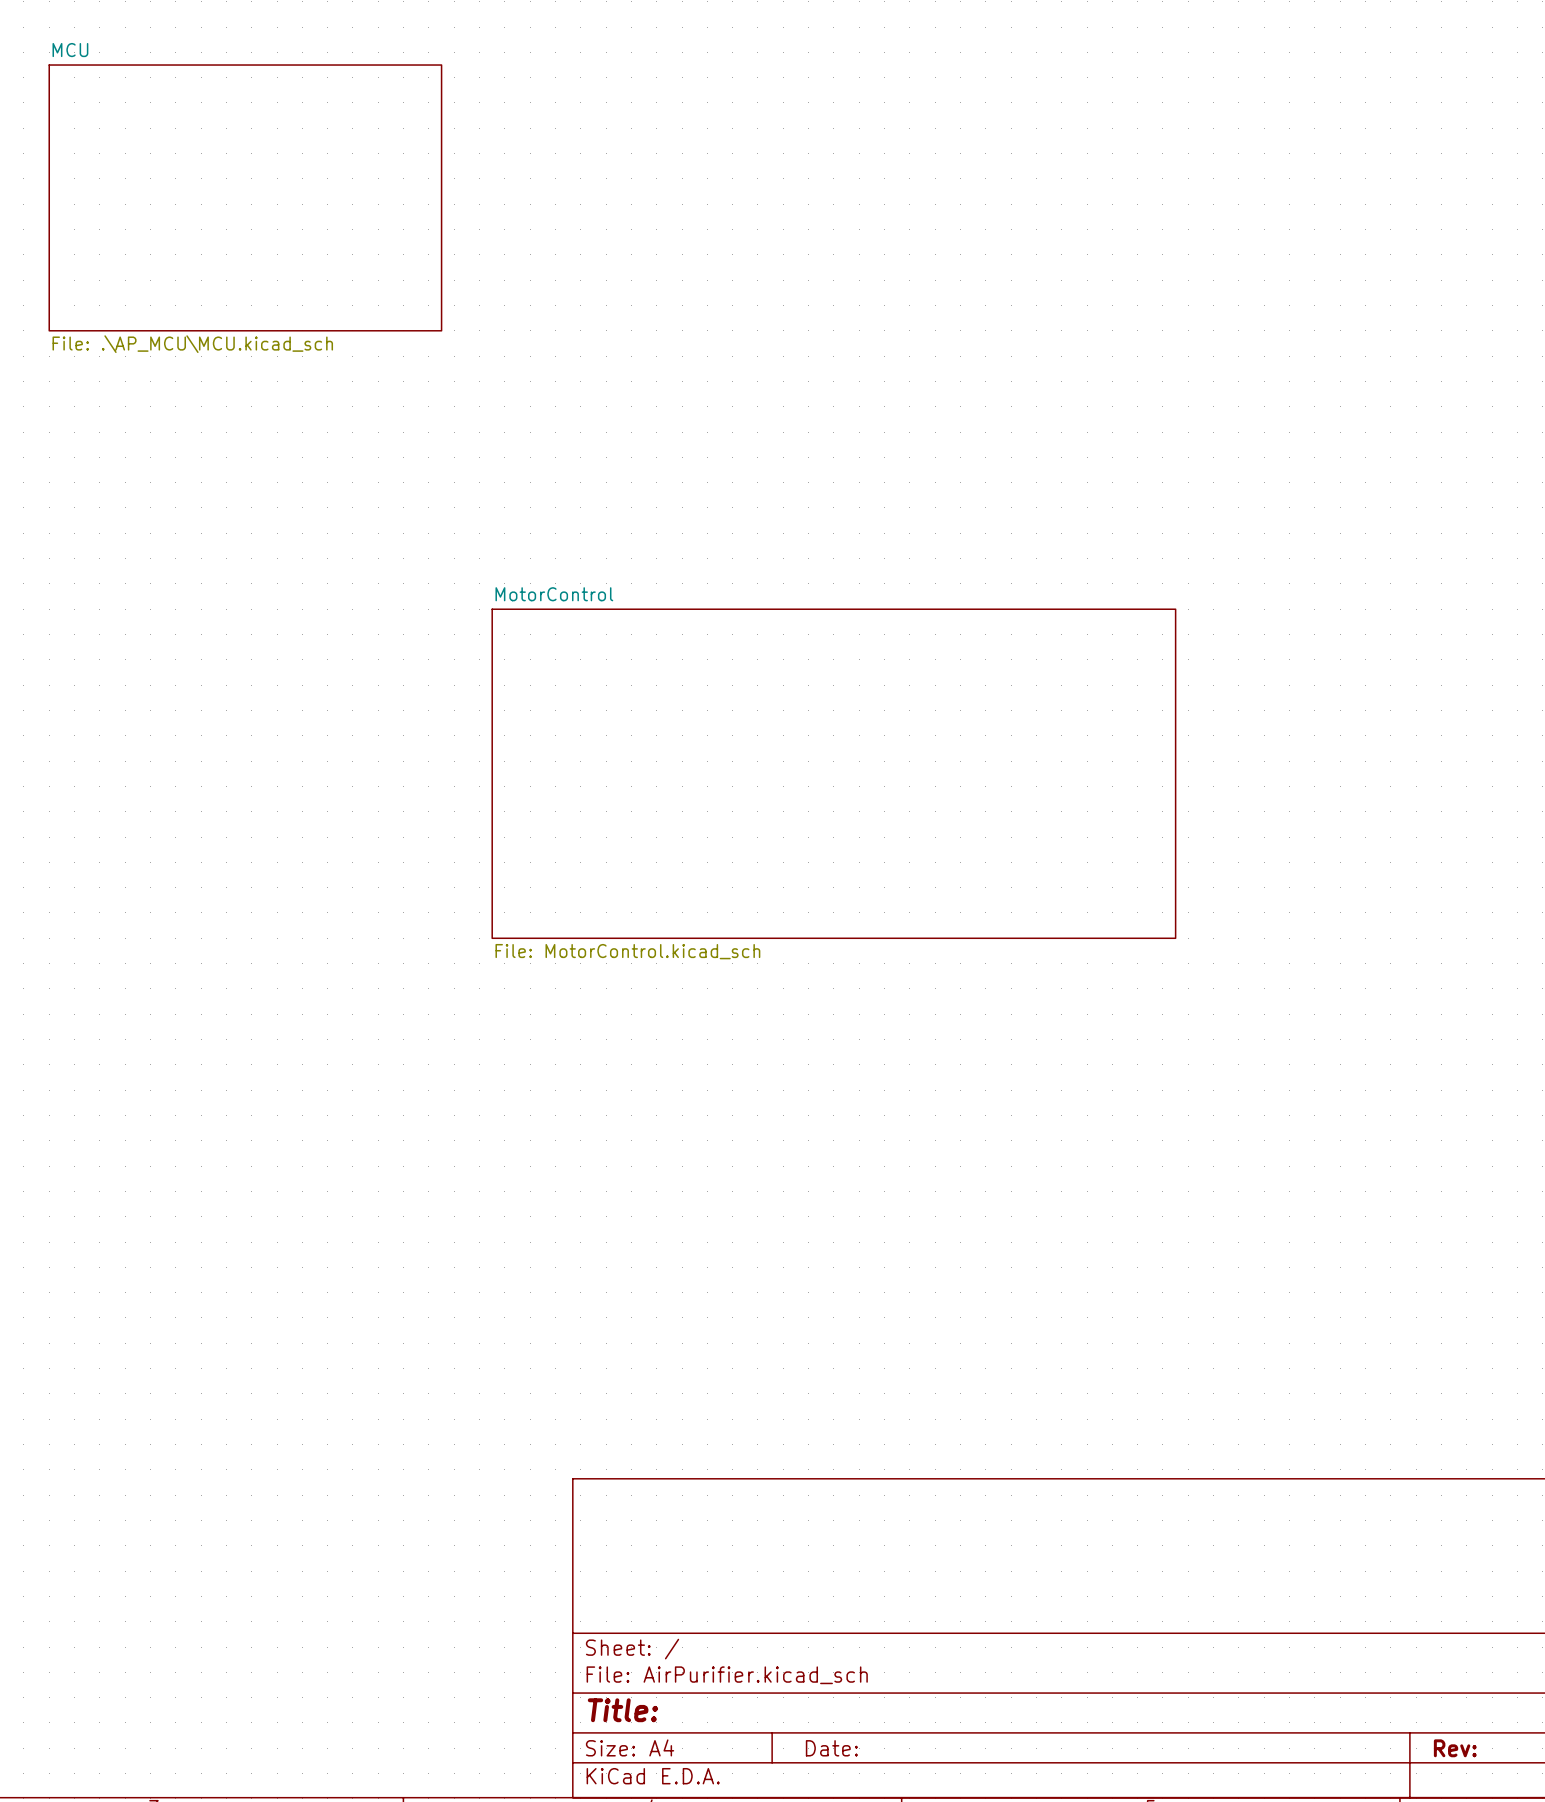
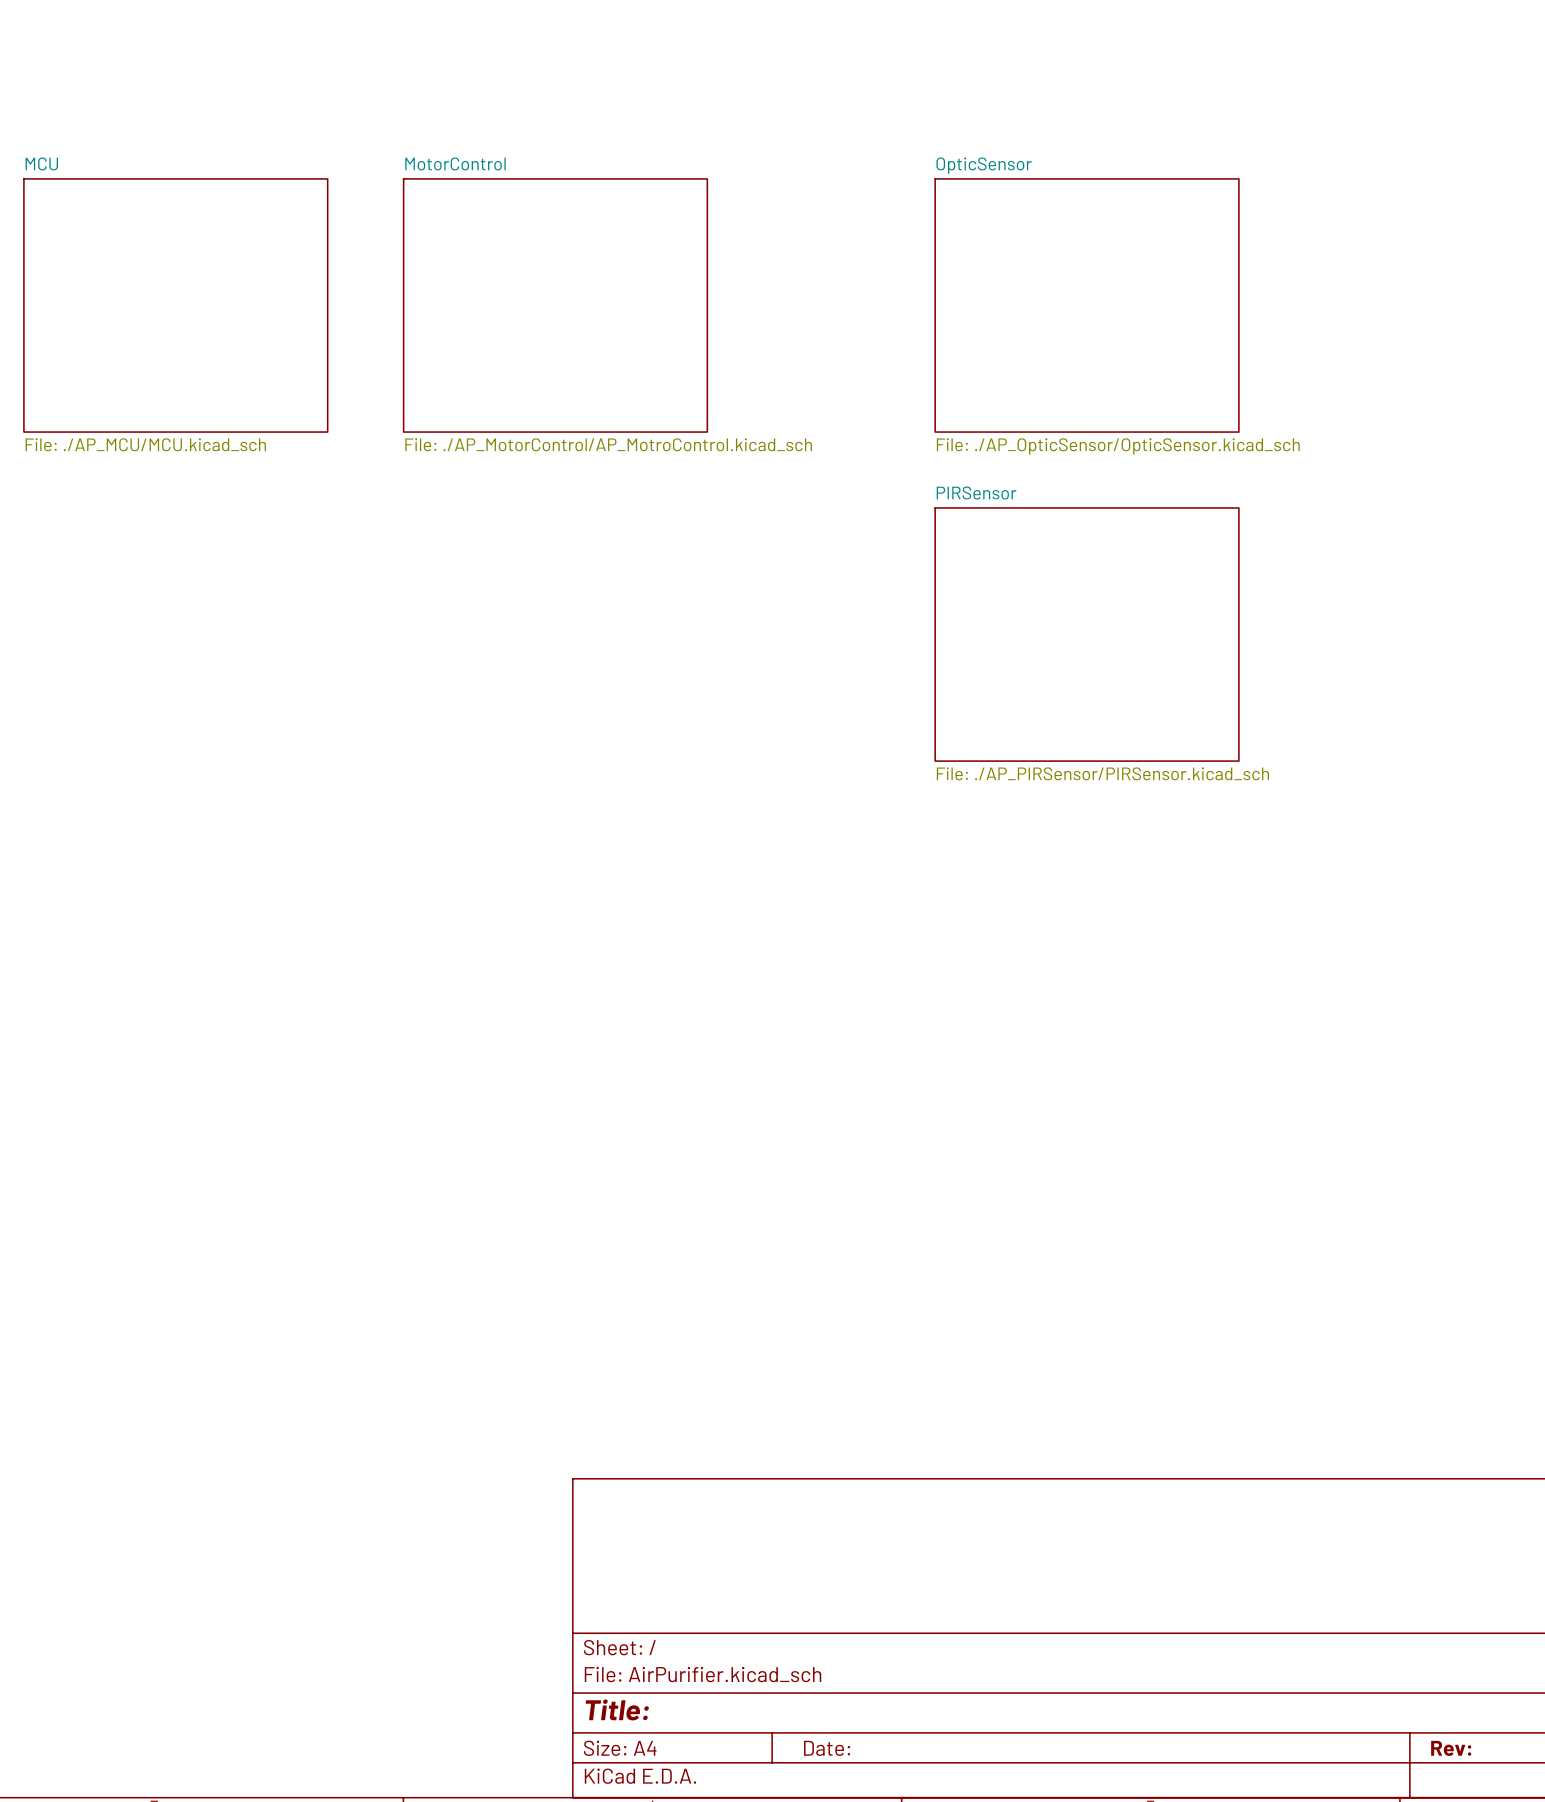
sheet MCU: File: .\AP_MCU\MCU.kicad_sch (245, 197) -> none
sheet MCU: none -> File: ./AP_MCU/MCU.kicad_sch (175, 305)
sheet MotorControl: none -> File: ./AP_MotorControl/AP_MotroControl.kicad_sch (555, 305)
sheet OpticSensor: none -> File: ./AP_OpticSensor/OpticSensor.kicad_sch (1087, 305)
sheet PIRSensor: none -> File: ./AP_PIRSensor/PIRSensor.kicad_sch (1087, 634)
sheet MotorControl: File: MotorControl.kicad_sch (833, 773) -> none

